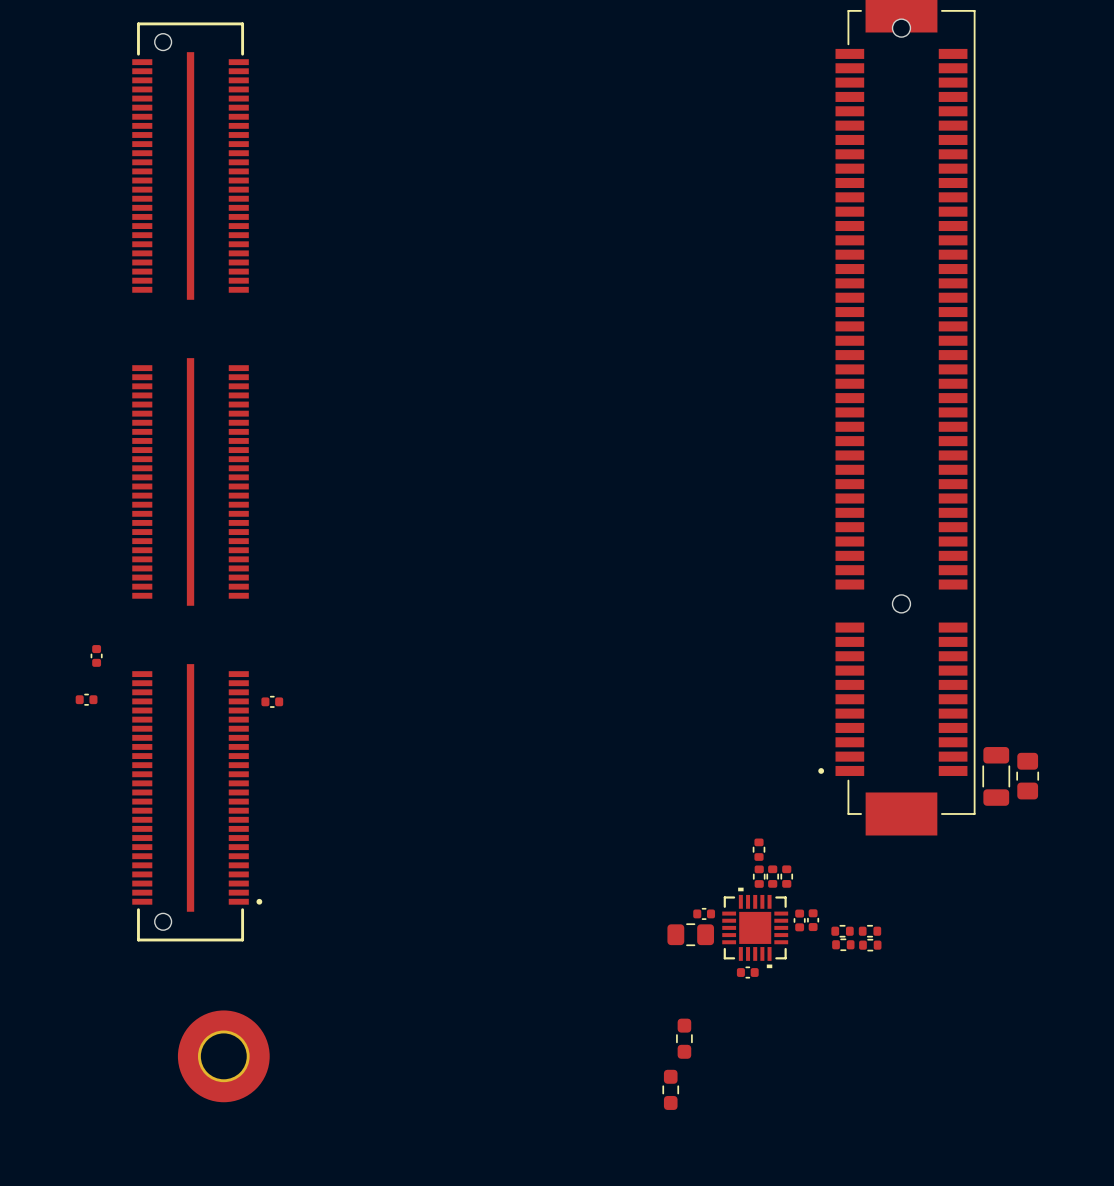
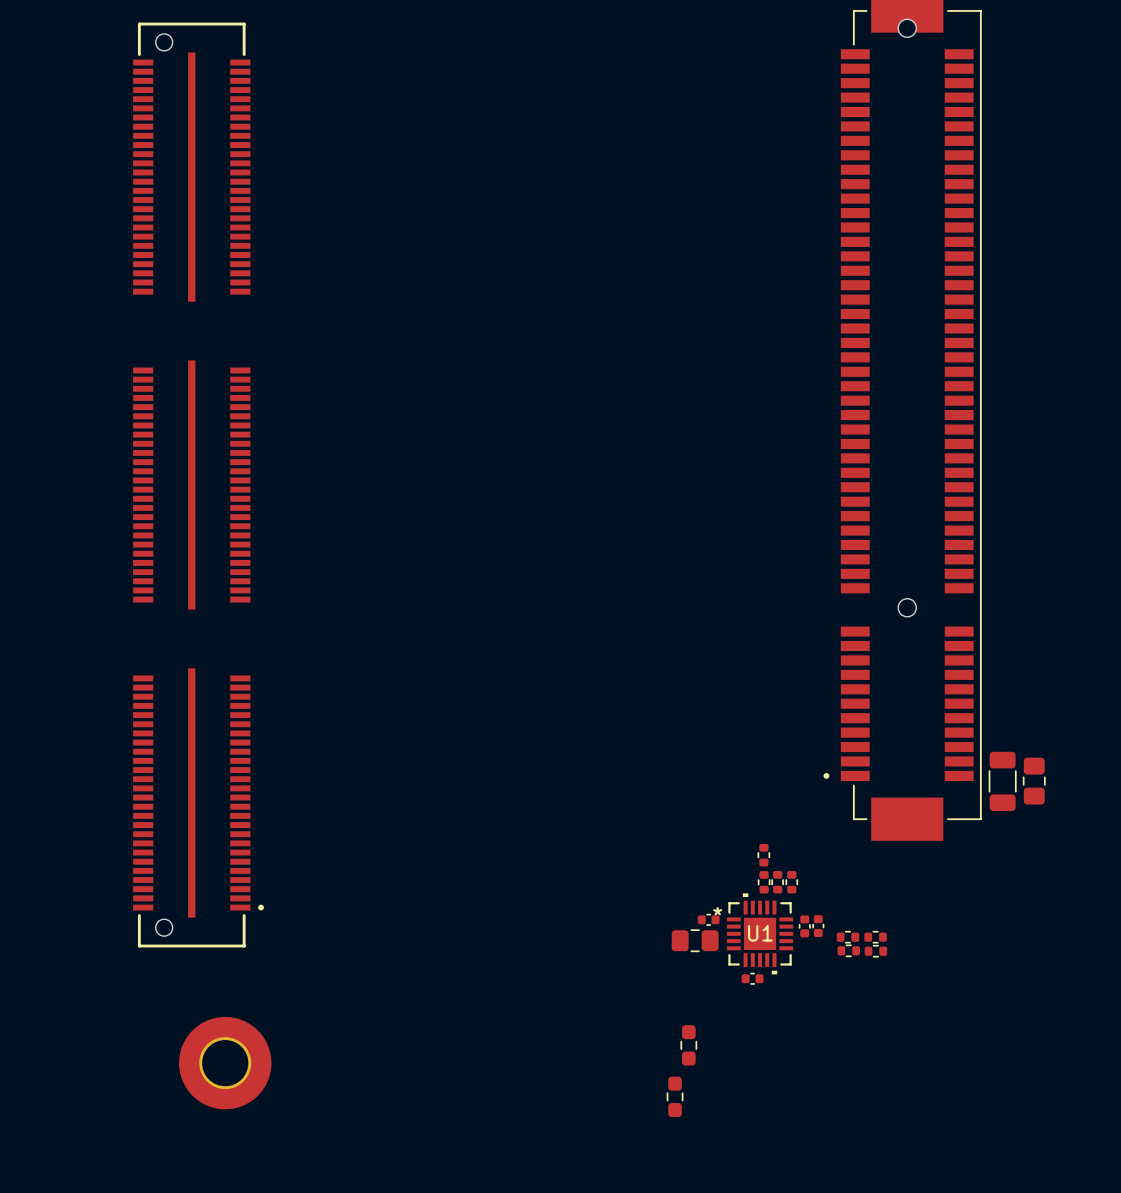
part: (96, 655) -> none
part: (86, 699) -> none
part: (272, 701) -> none
U1 text: none -> * (717, 911)
U1 name: none -> U1 (760, 933)

